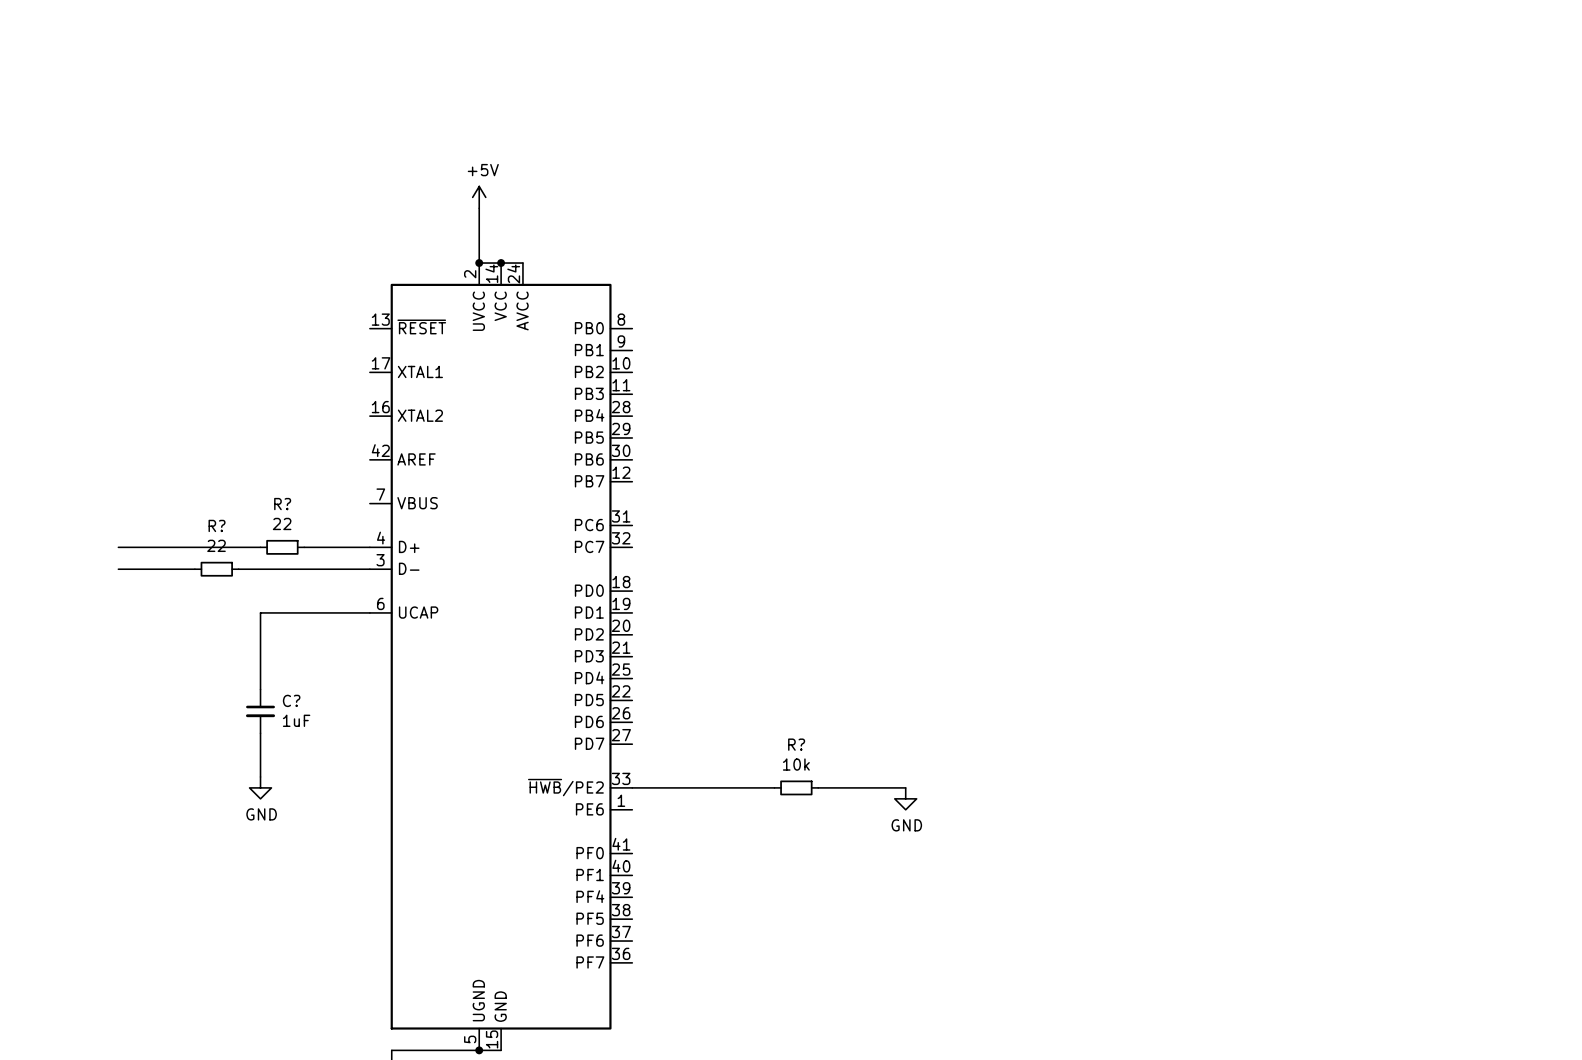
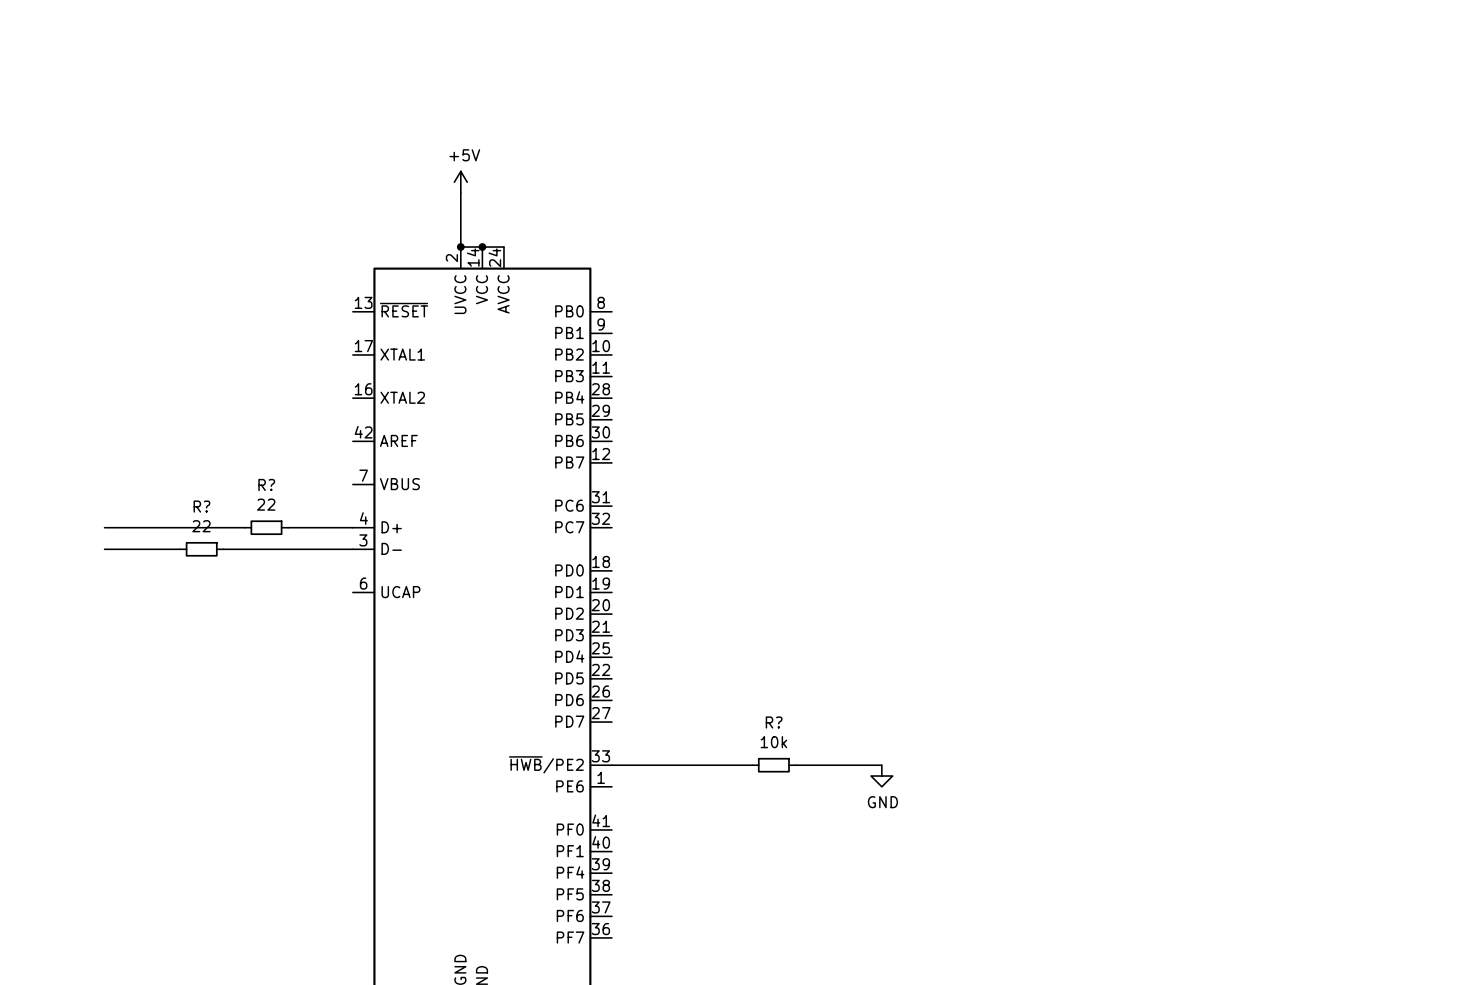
wire: (369, 612) (260, 612) (260, 689) -> none
C?: 1uF (260, 711) -> none
wire: (260, 733) (260, 776) -> none
power symbol: GND (260, 787) -> none

